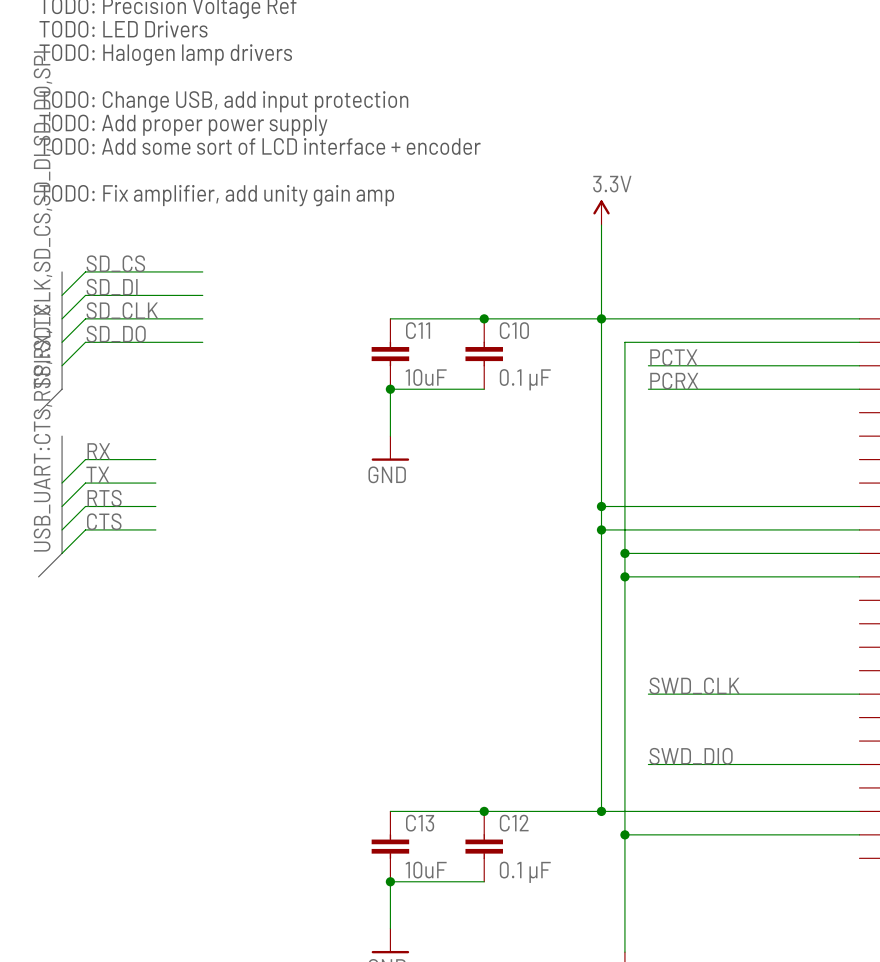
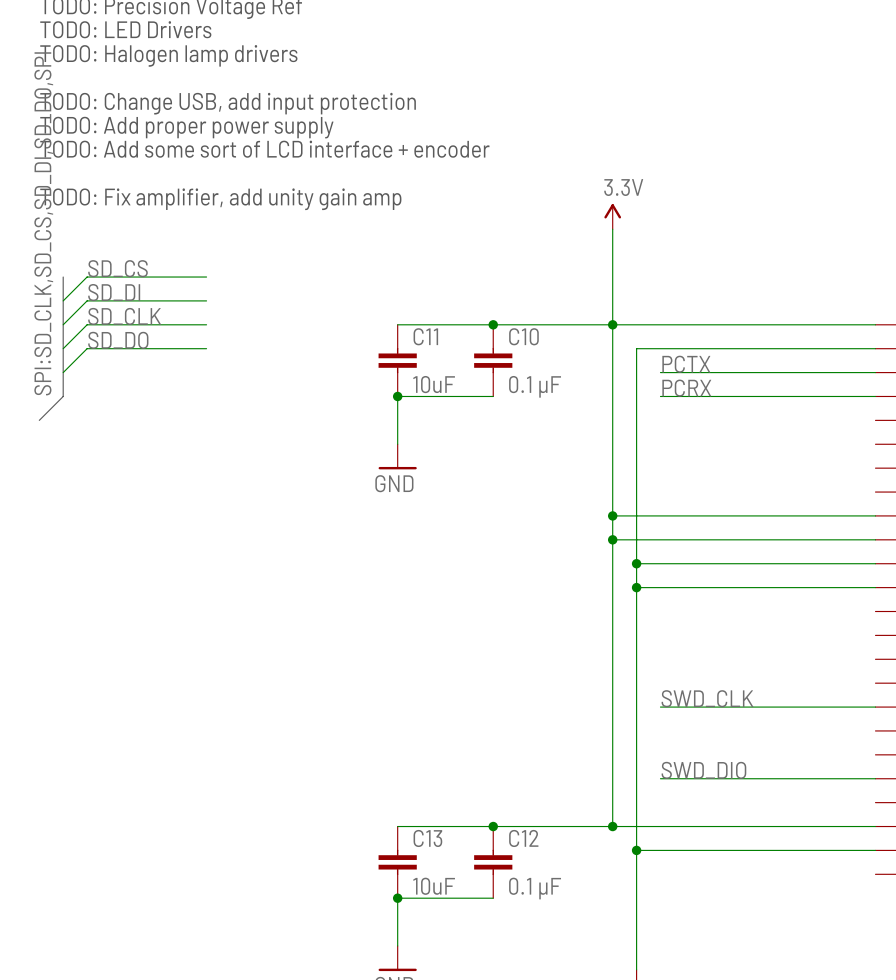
label: USB_UART:CTS,RTS,RX,TX (42, 428) -> none
bus: (62, 436) (62, 553) (38, 576) -> none
label: RX (98, 451) -> none
wire: (155, 459) (85, 459) (62, 483) -> none
label: TX (97, 474) -> none
wire: (155, 483) (85, 483) (62, 506) -> none
label: RTS (104, 498) -> none
wire: (155, 506) (85, 506) (62, 529) -> none
label: CTS (104, 521) -> none
wire: (155, 529) (85, 529) (62, 553) -> none

